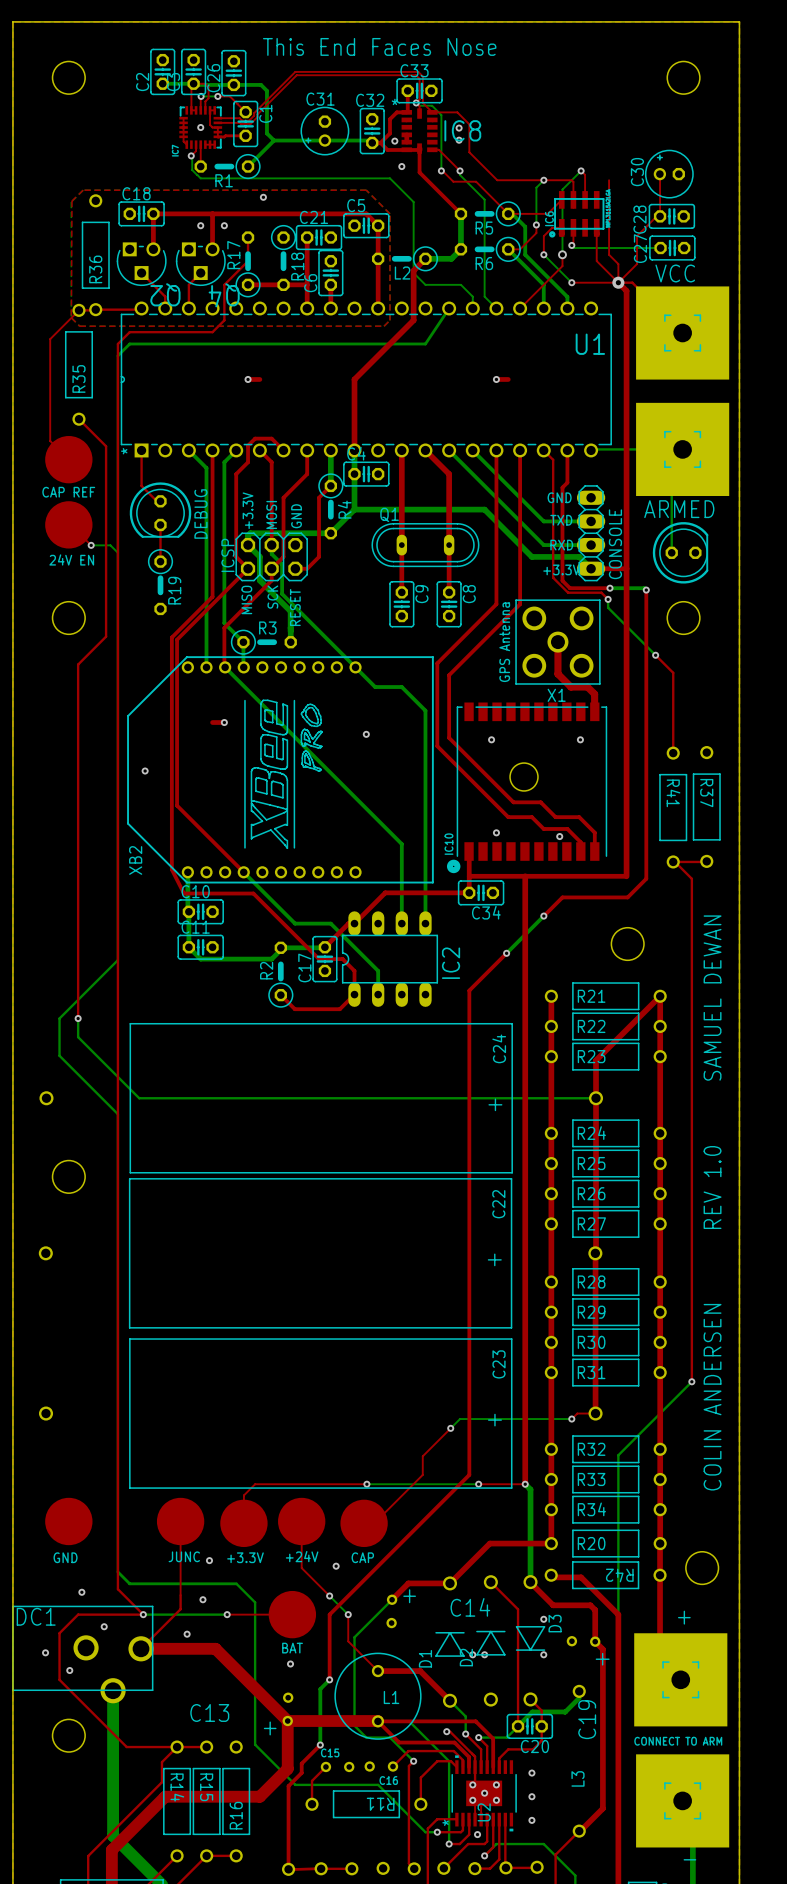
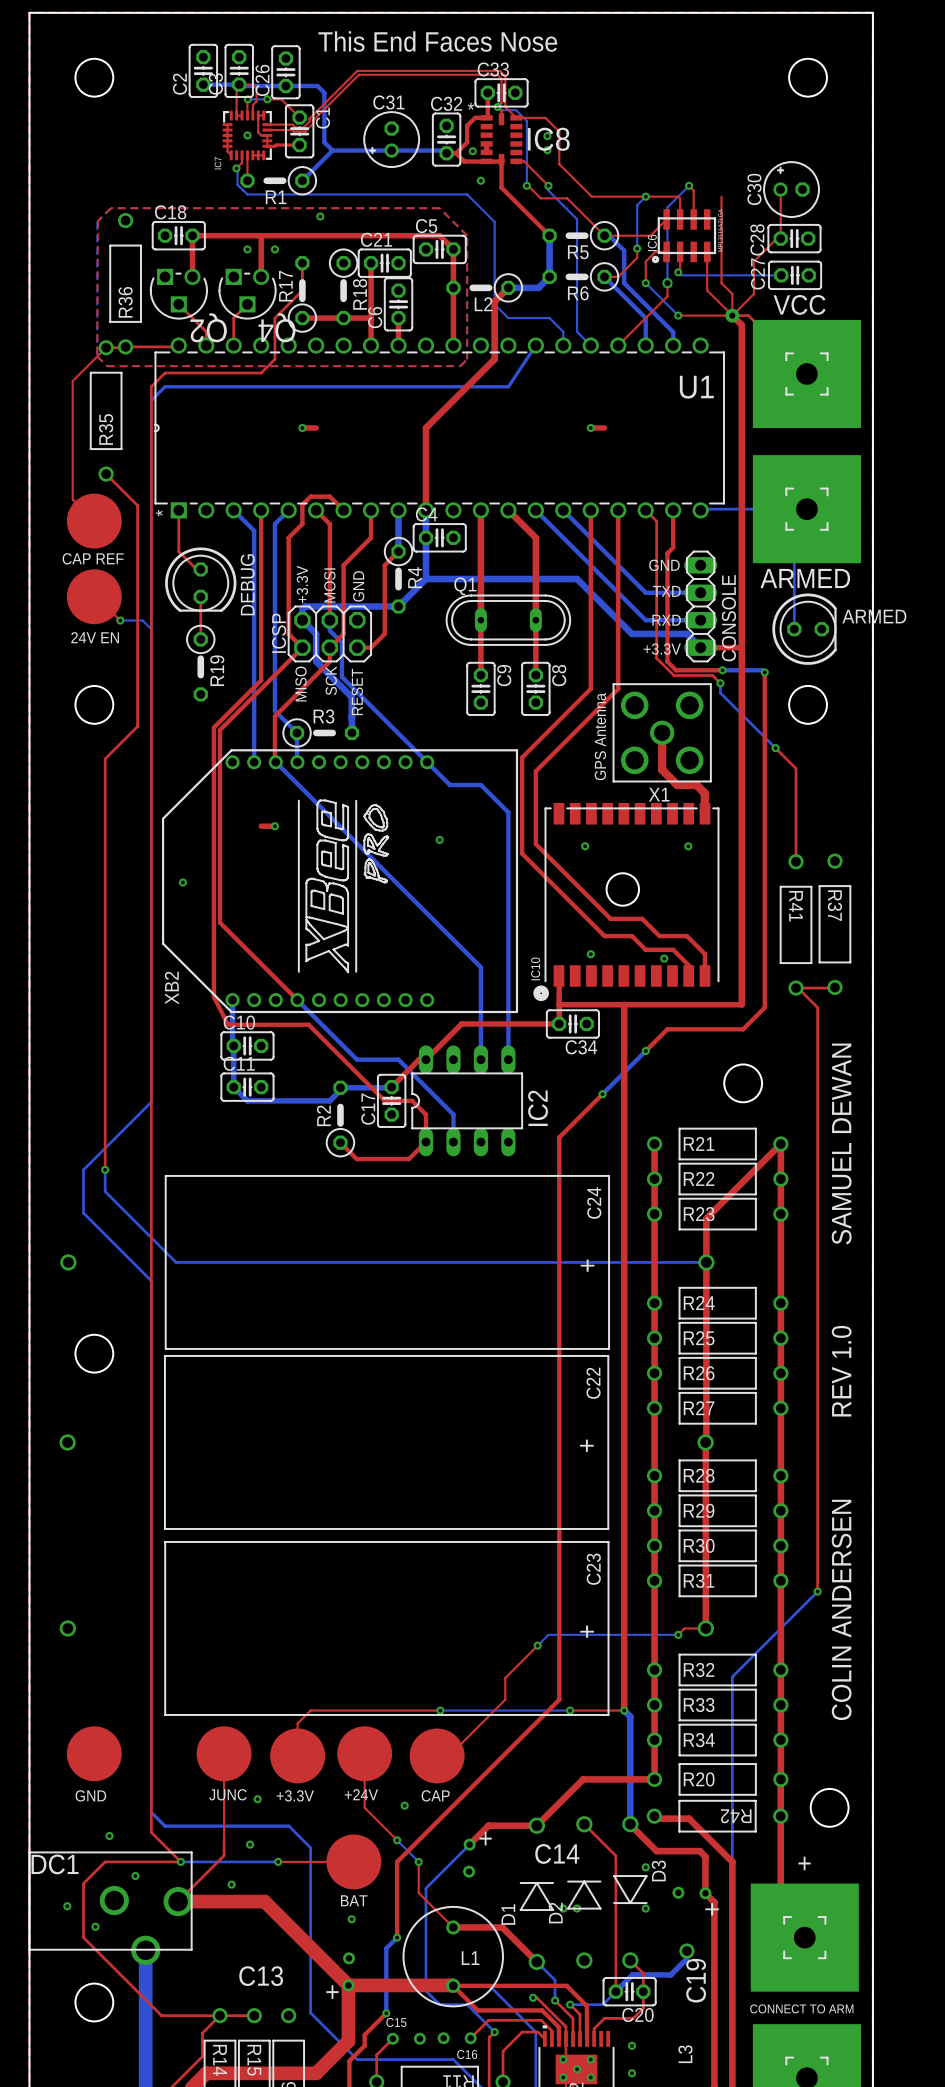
ARMED name: none -> ARMED (874, 616)

